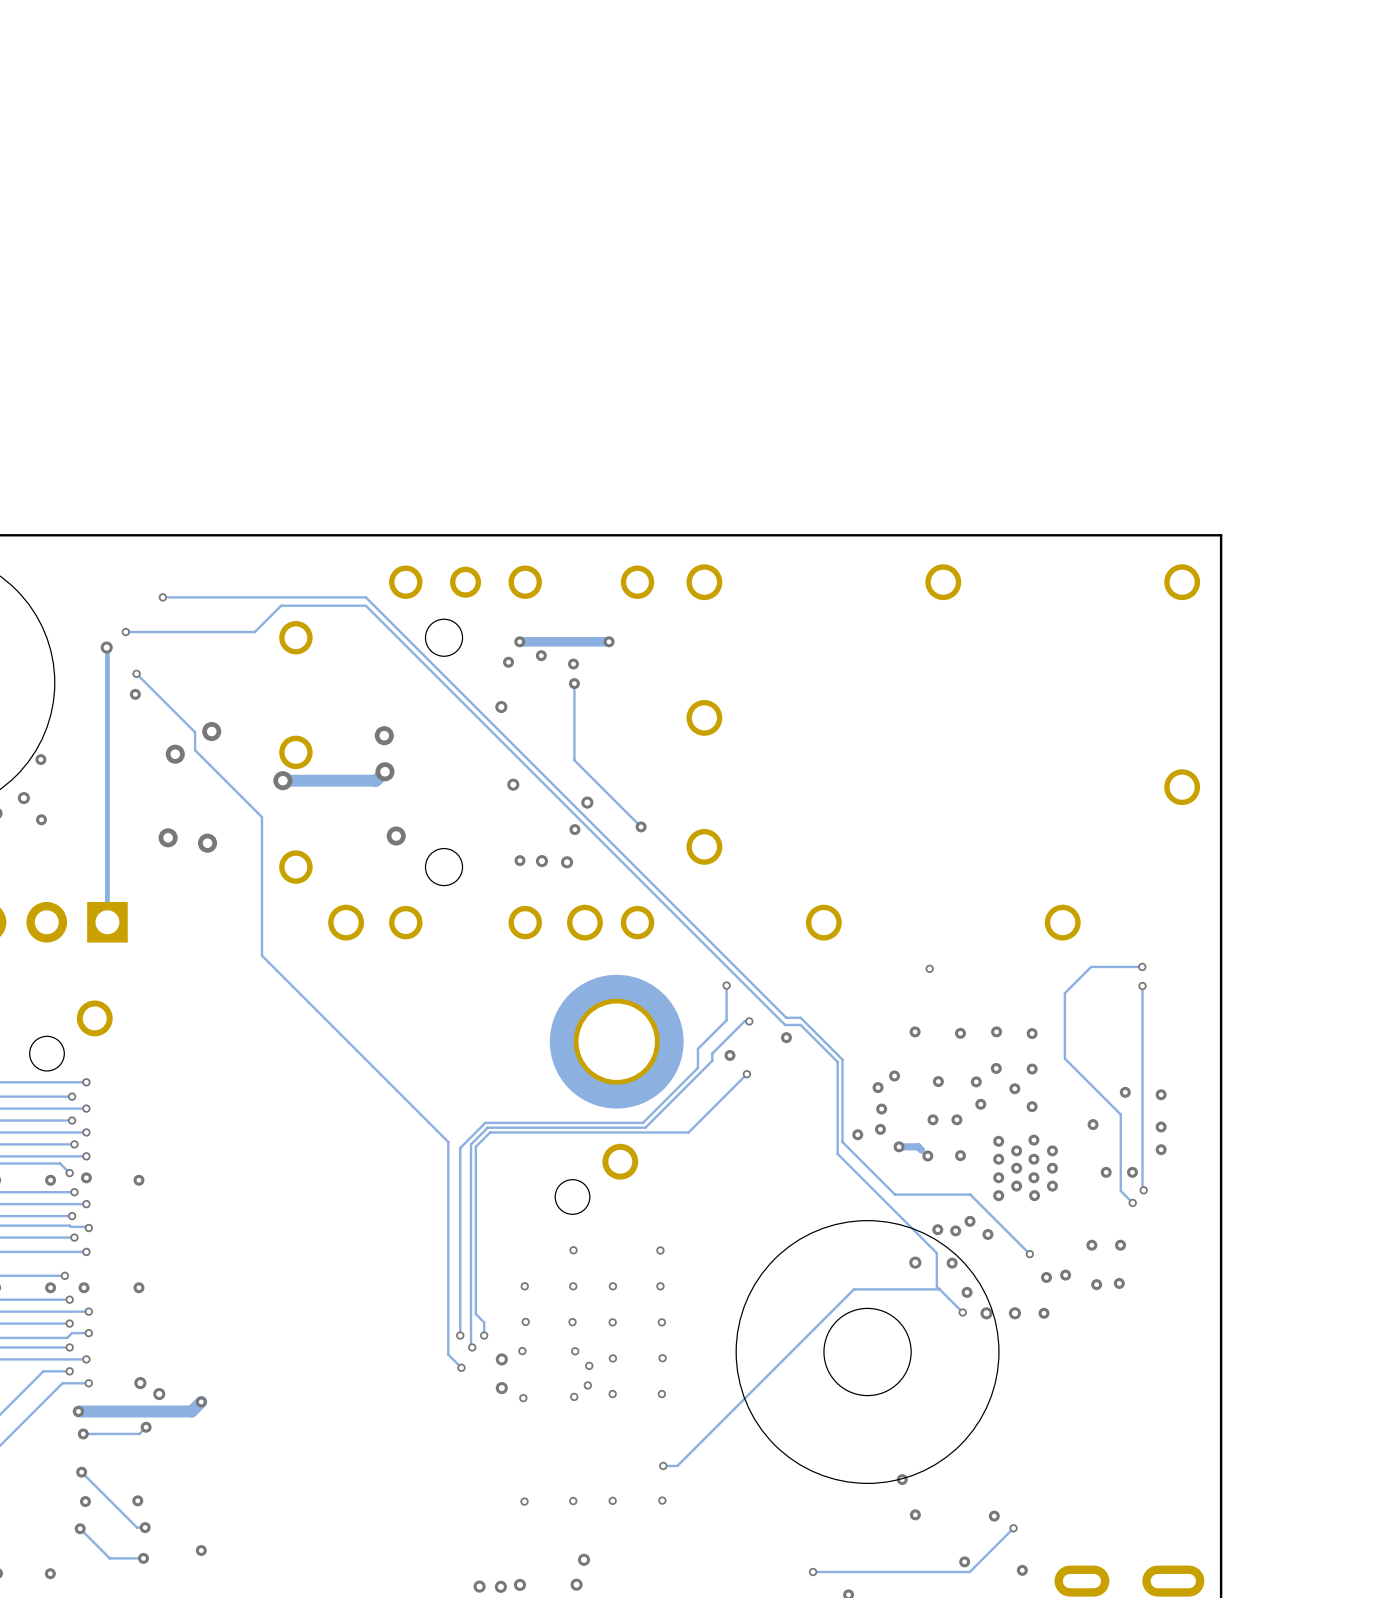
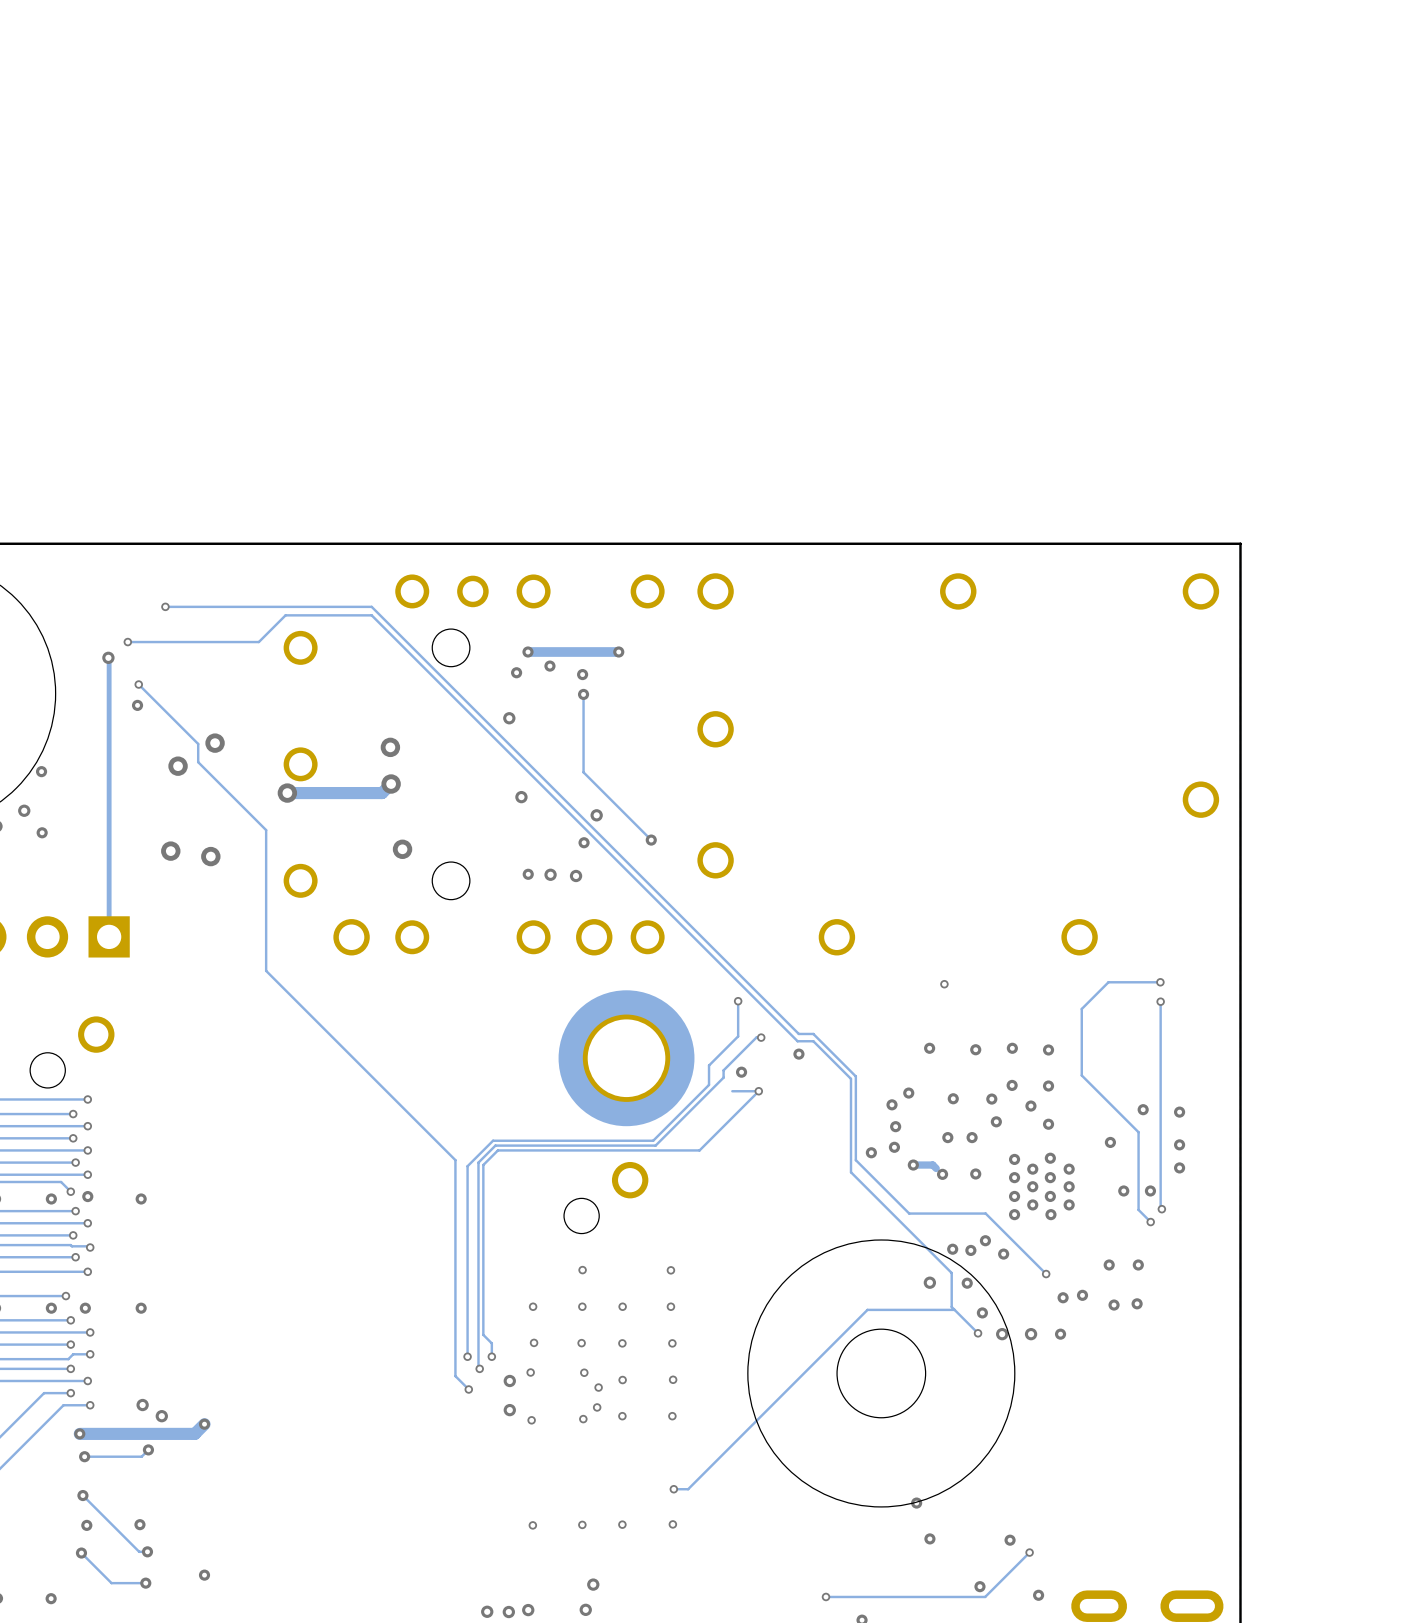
track: none -> (758, 1091) (732, 1091)

